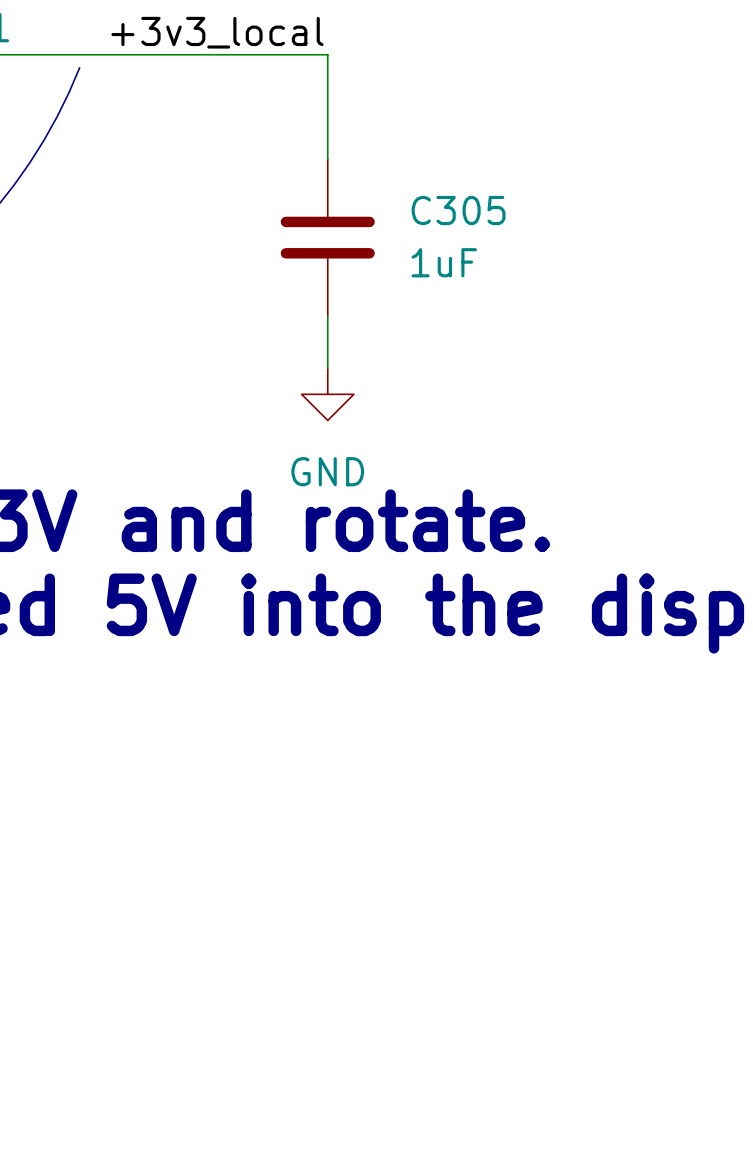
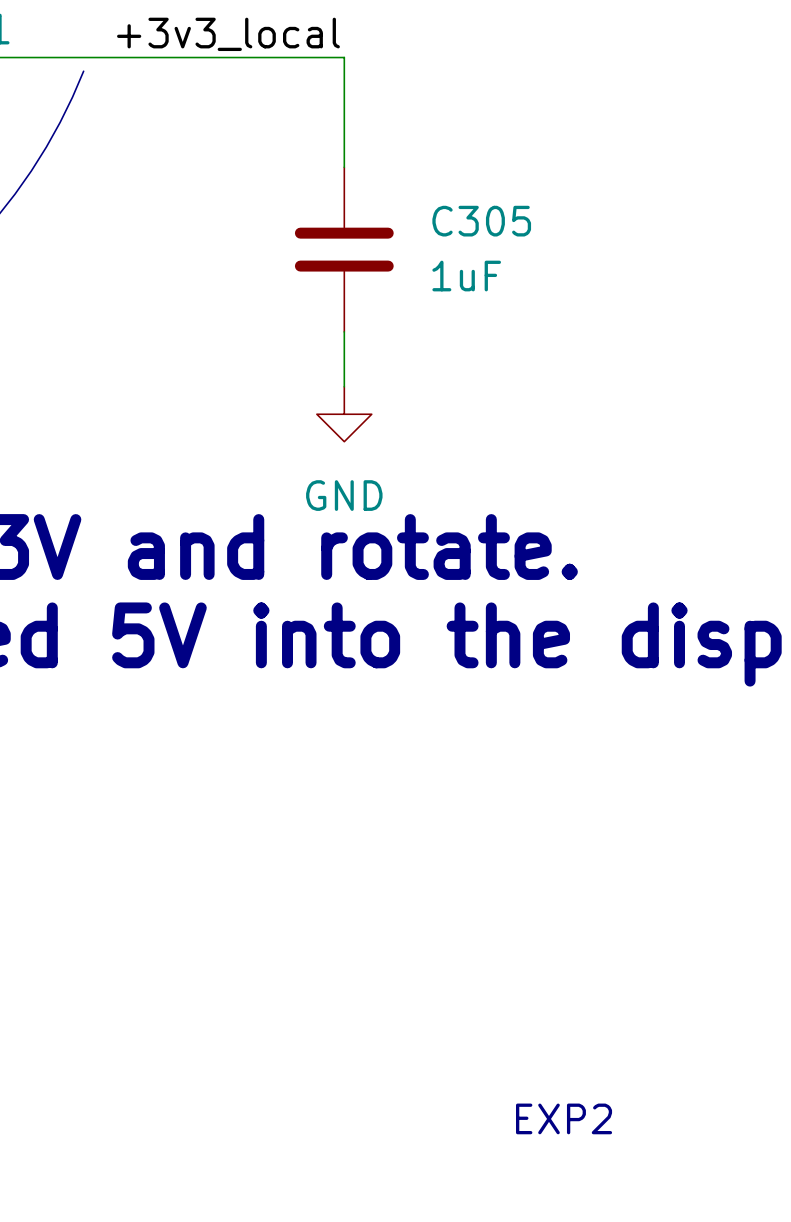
text: none -> EXP2 (564, 1118)

